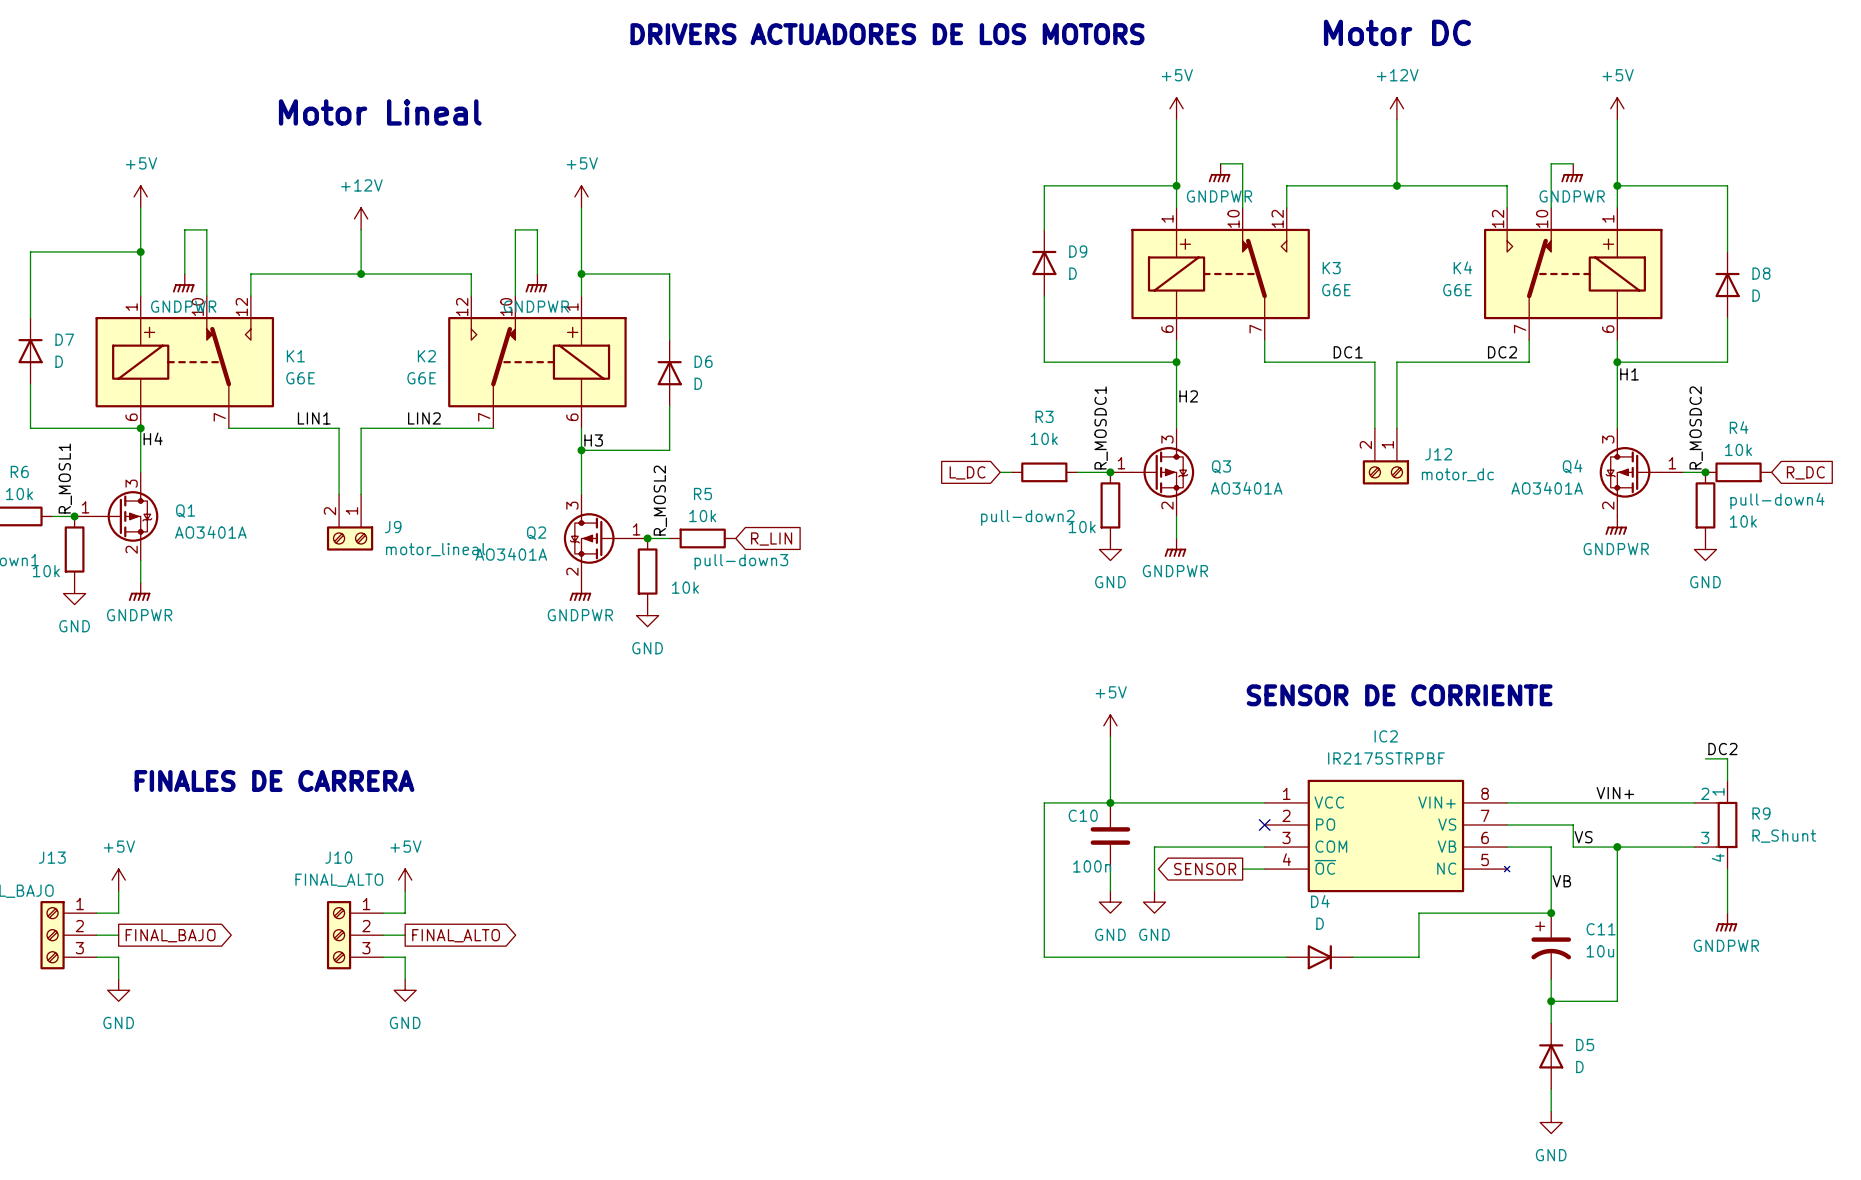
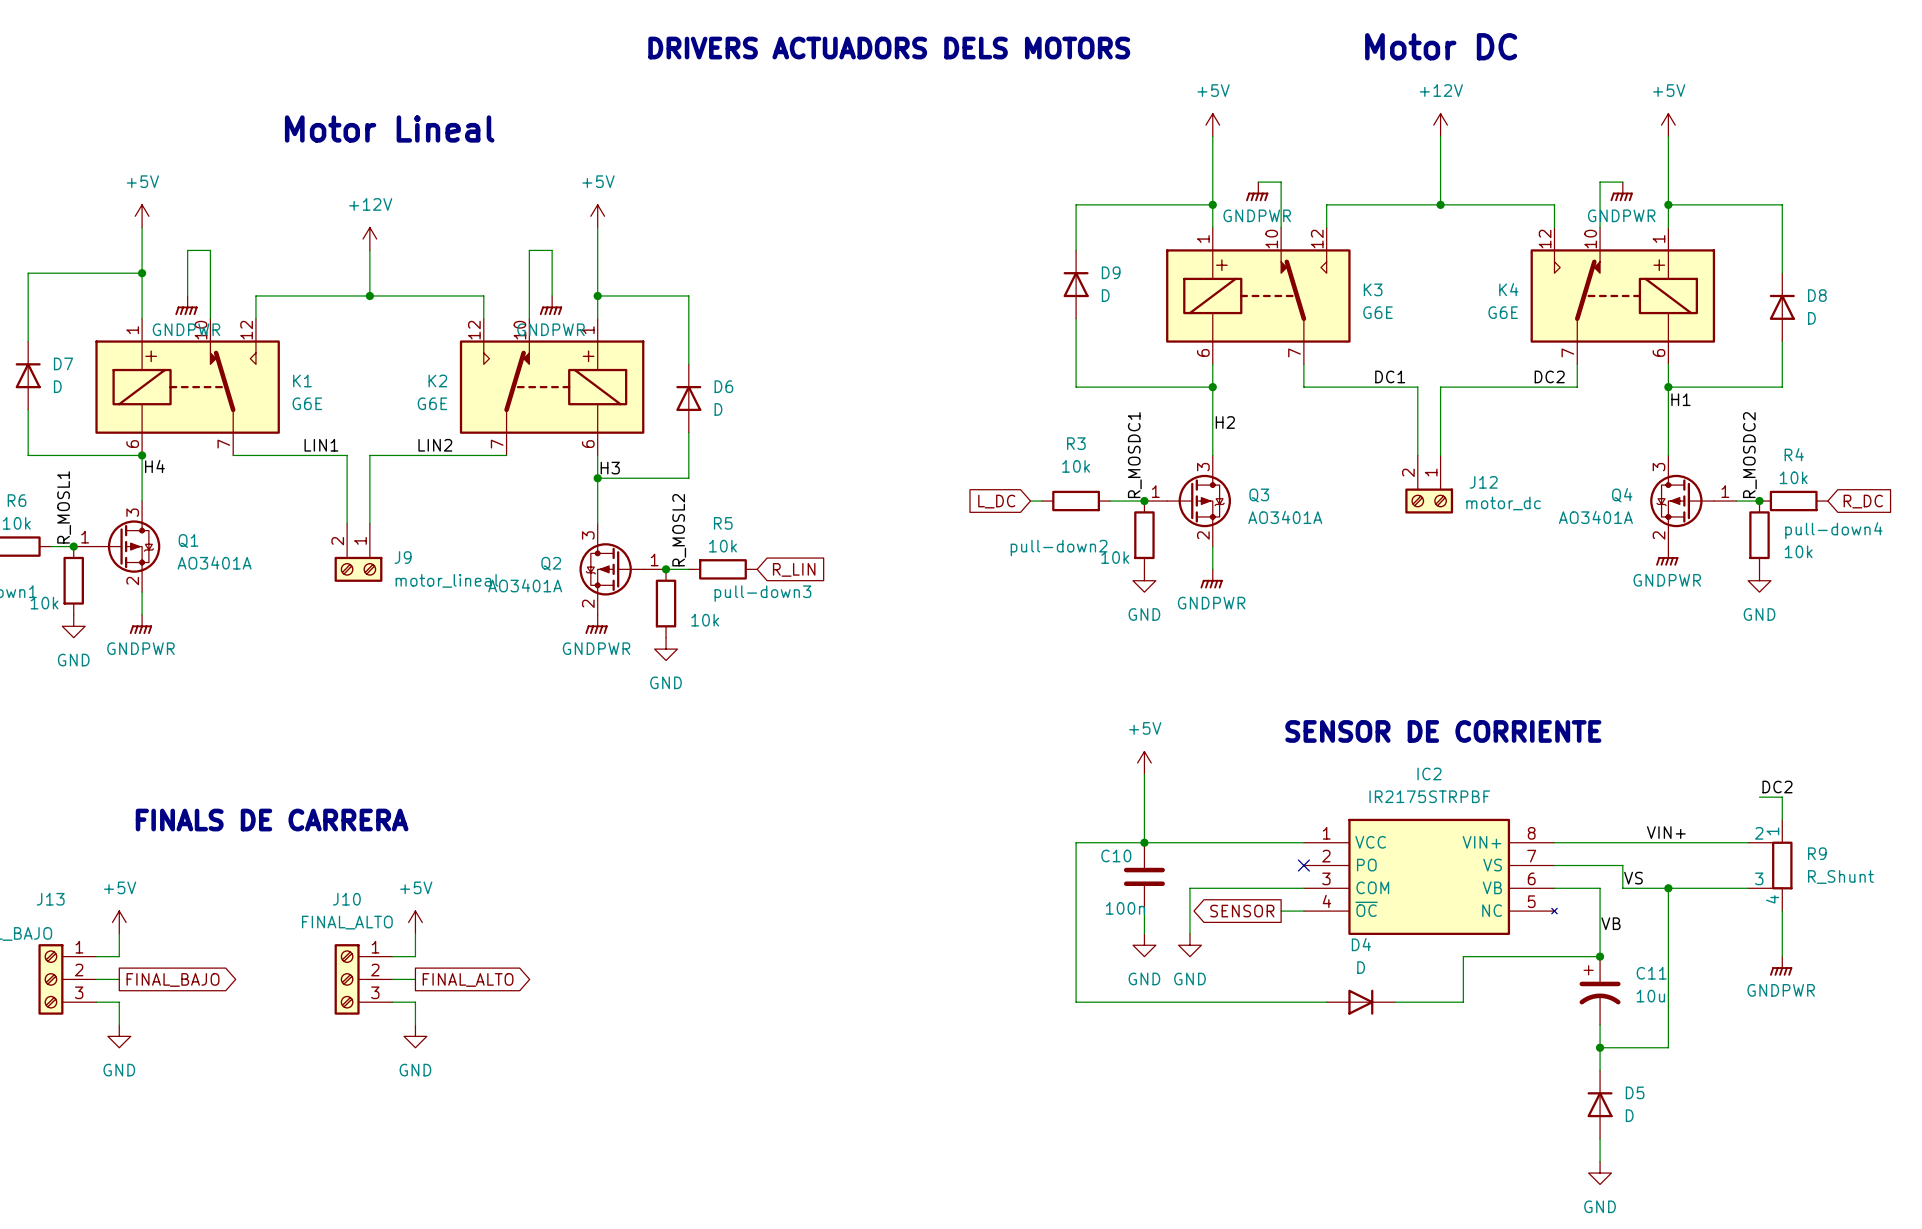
text: DRIVERS ACTUADORES DE LOS MOTORS (887, 34) -> DRIVERS ACTUADORS DELS MOTORS (889, 48)
text: FINALES DE CARRERA (274, 780) -> FINALS DE CARRERA (272, 820)

